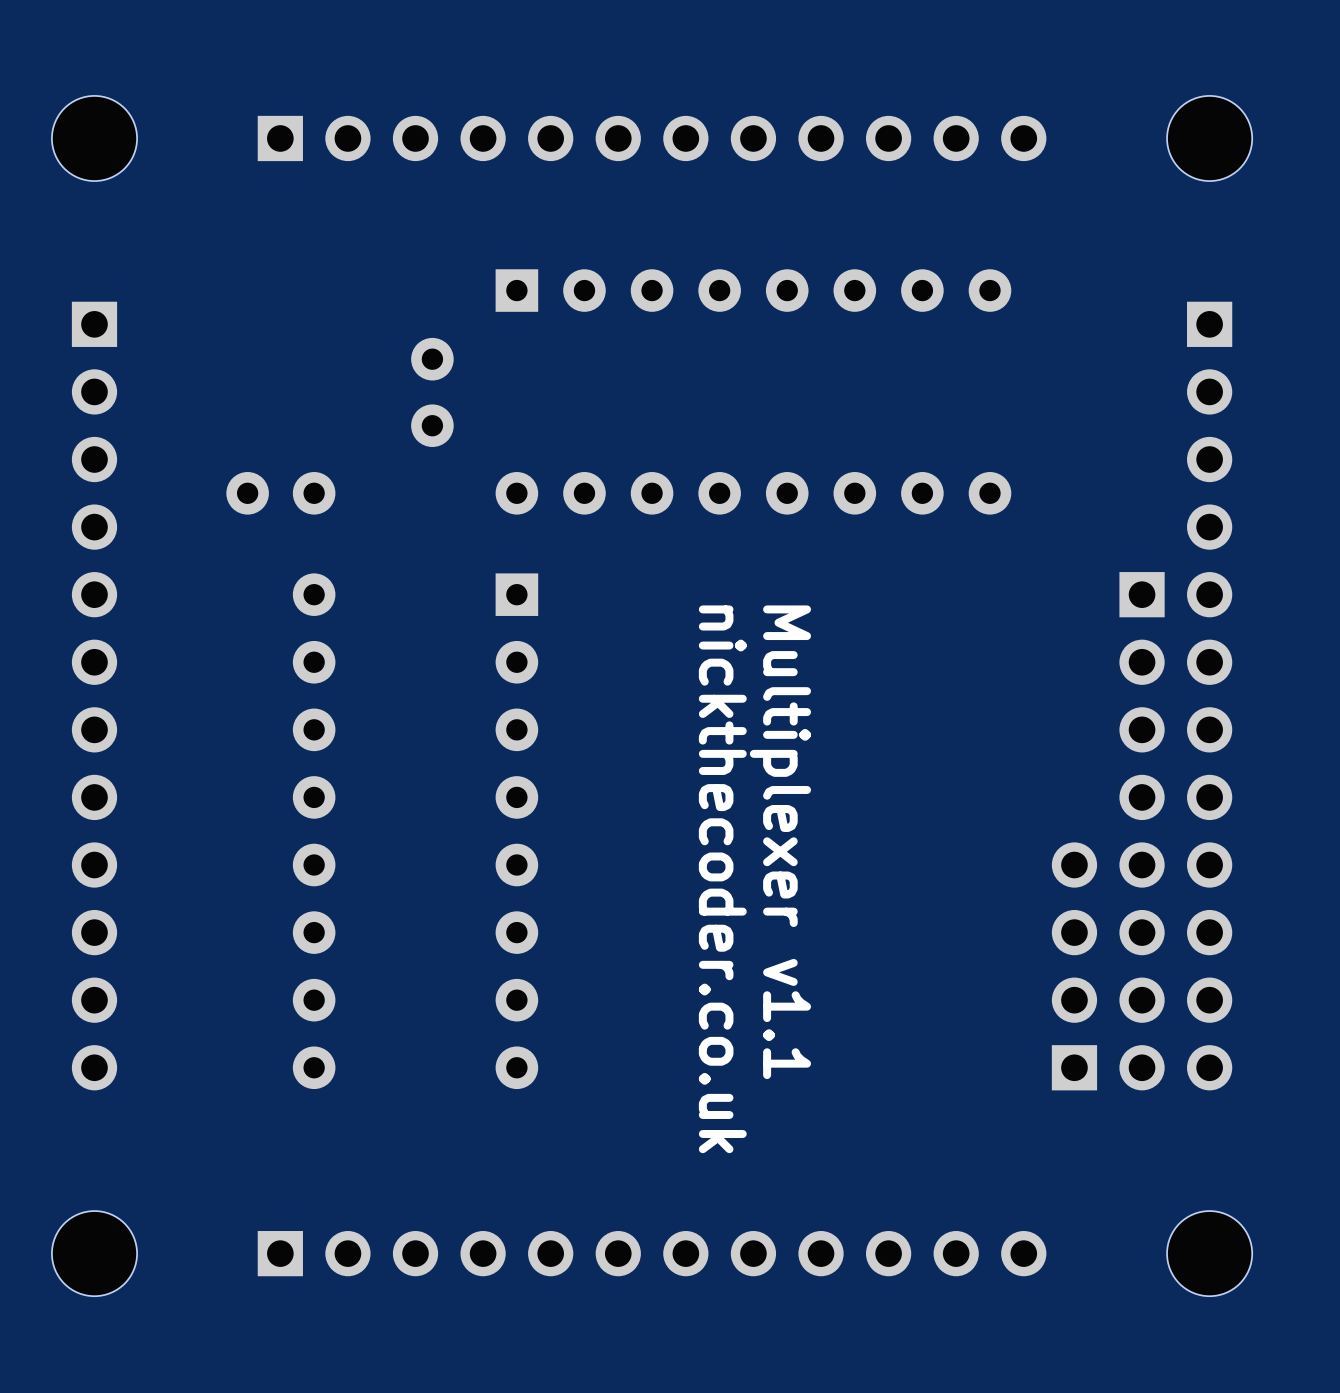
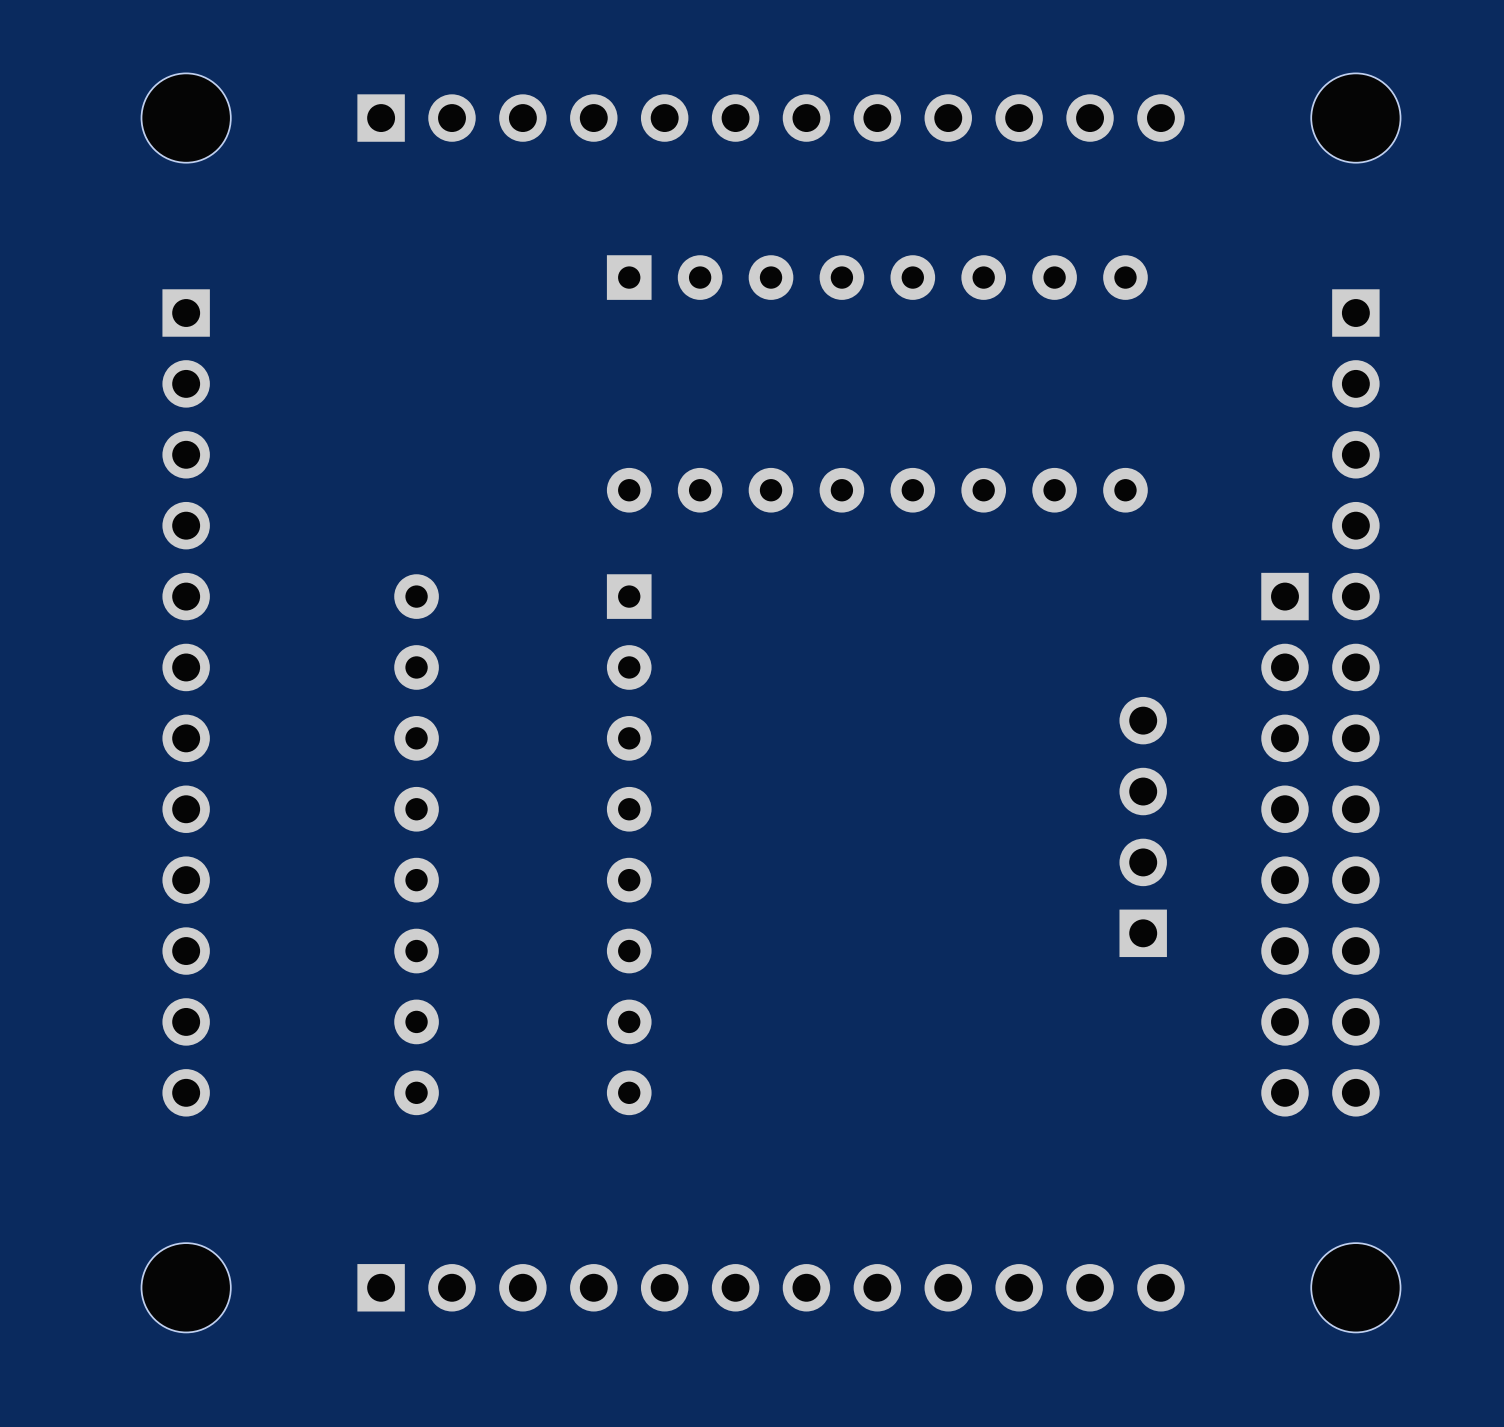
part: (432, 392) -> none
part: (280, 493) -> none
text: Multiplexer v1.1 (780, 842) -> none
text: nickthecoder.co.uk (722, 879) -> none
part position: (1074, 966) -> (1143, 826)

